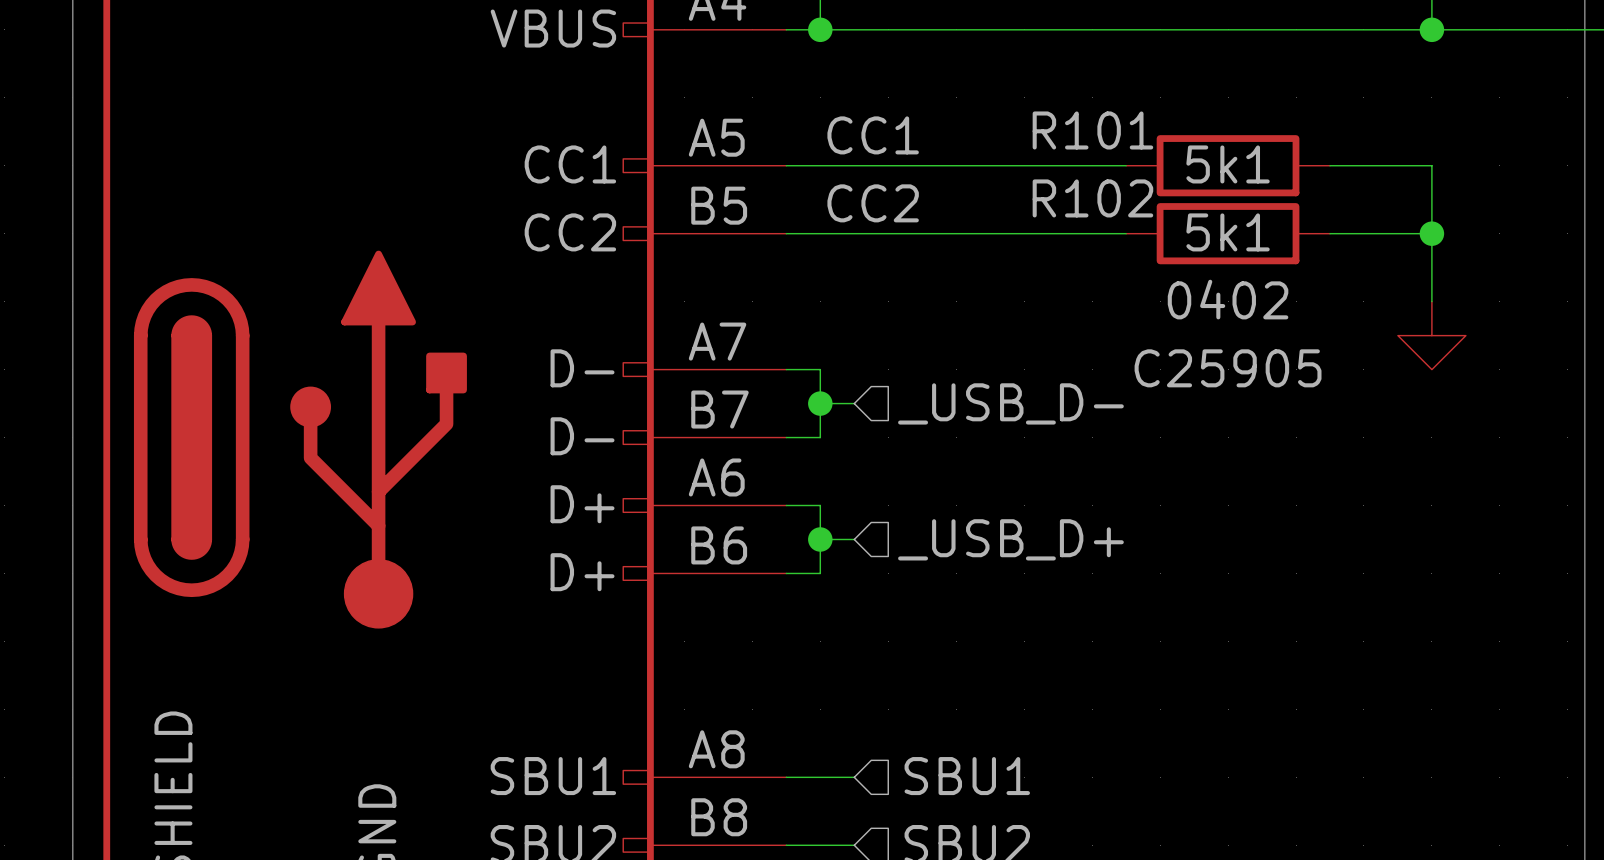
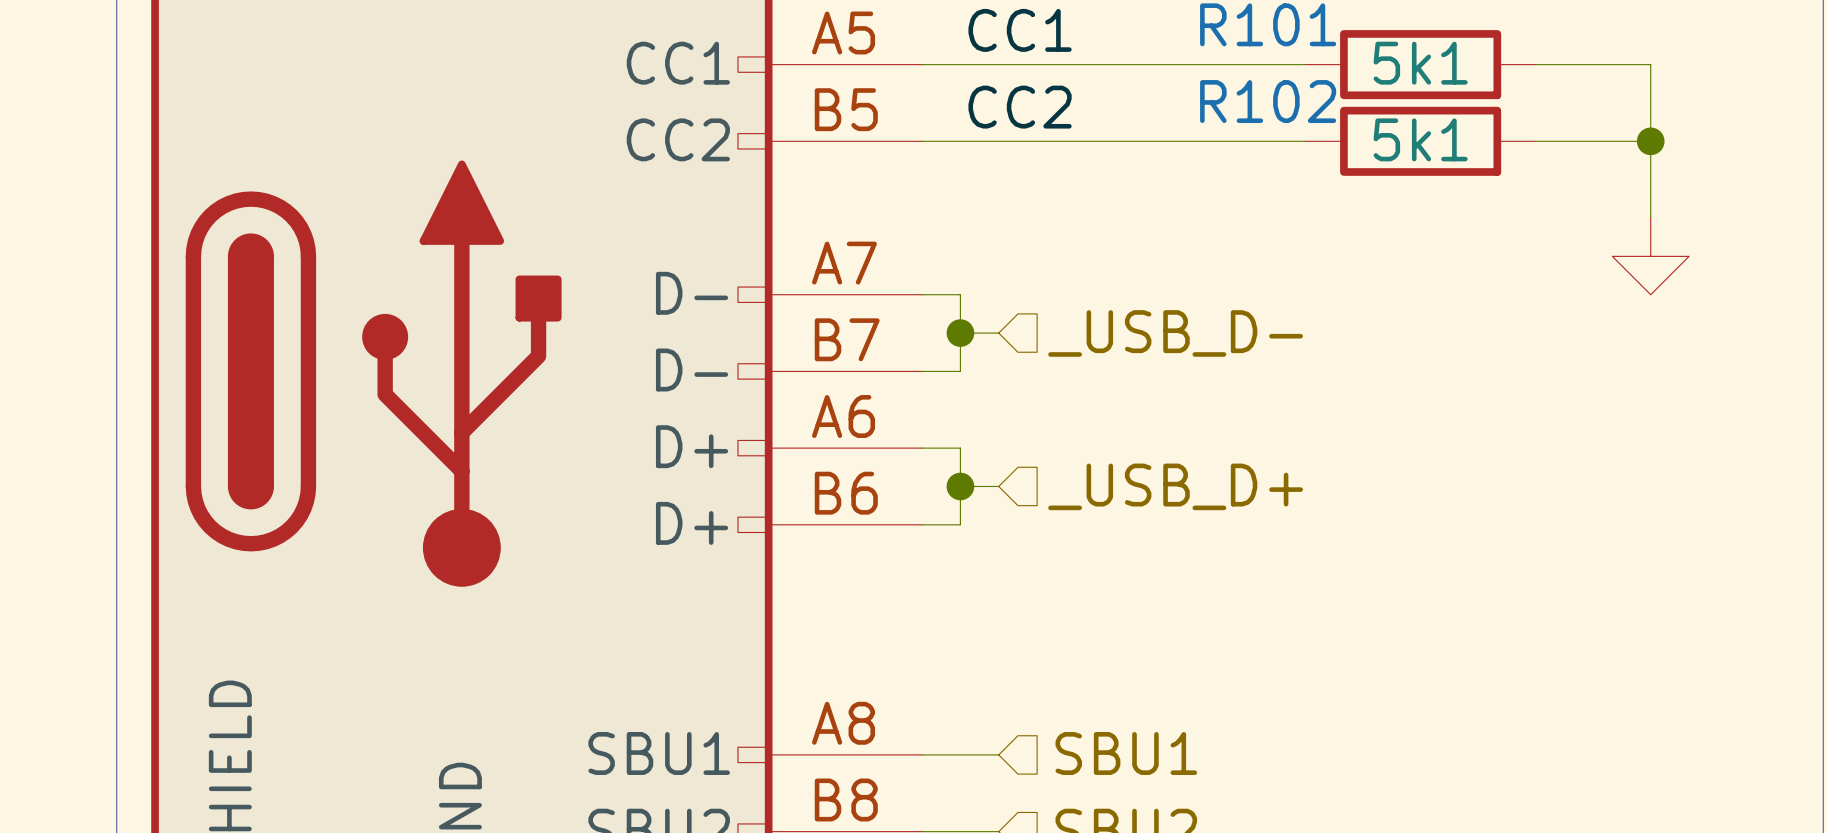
R102 text: 0402 (1228, 299) -> none
R102 text: C25905 (1228, 368) -> none

